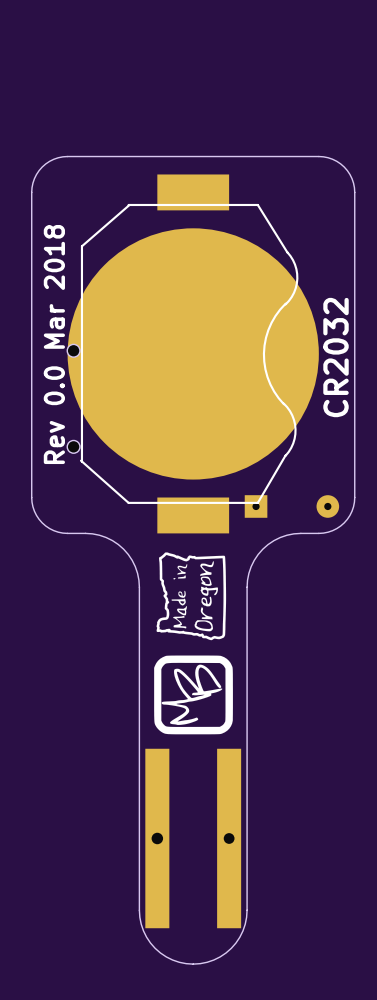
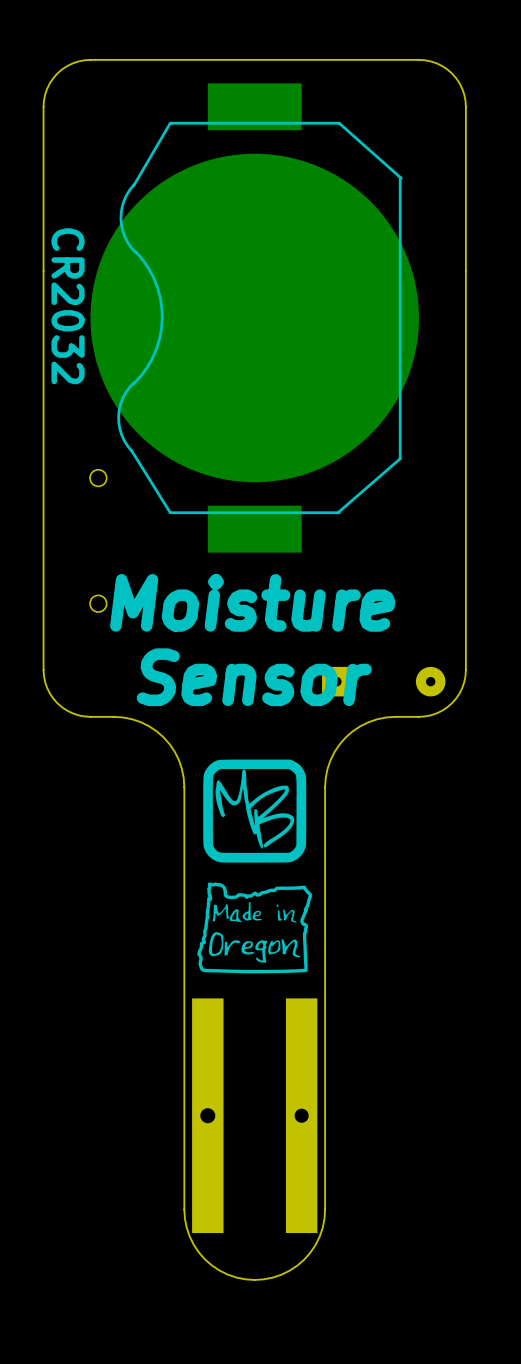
board edge: (354, 192) (352, 178) (344, 167) (332, 159) (318, 156) (62, 156) (49, 161) (39, 170) (32, 183) (31, 192) -> (465, 271) (464, 94) (459, 83) (447, 69) (436, 63) (418, 59) (90, 59) (78, 61) (67, 66) (57, 73) (49, 83) (43, 100) (43, 271)
text: Rev 0.0 Mar 2018 (54, 344) -> none
part rotation: 0° (193, 353) -> 180° (254, 317)
text rotation: 0° (336, 357) -> 180° (68, 306)
text position: CR2032 (336, 357) -> CR2032 (68, 306)
text: none -> Moisture (252, 602)
text: none -> Sensor (254, 677)
drawing shape: [156, 552, 227, 641] -> [203, 759, 307, 863]
drawing shape: [154, 655, 233, 735] -> [197, 882, 312, 974]

